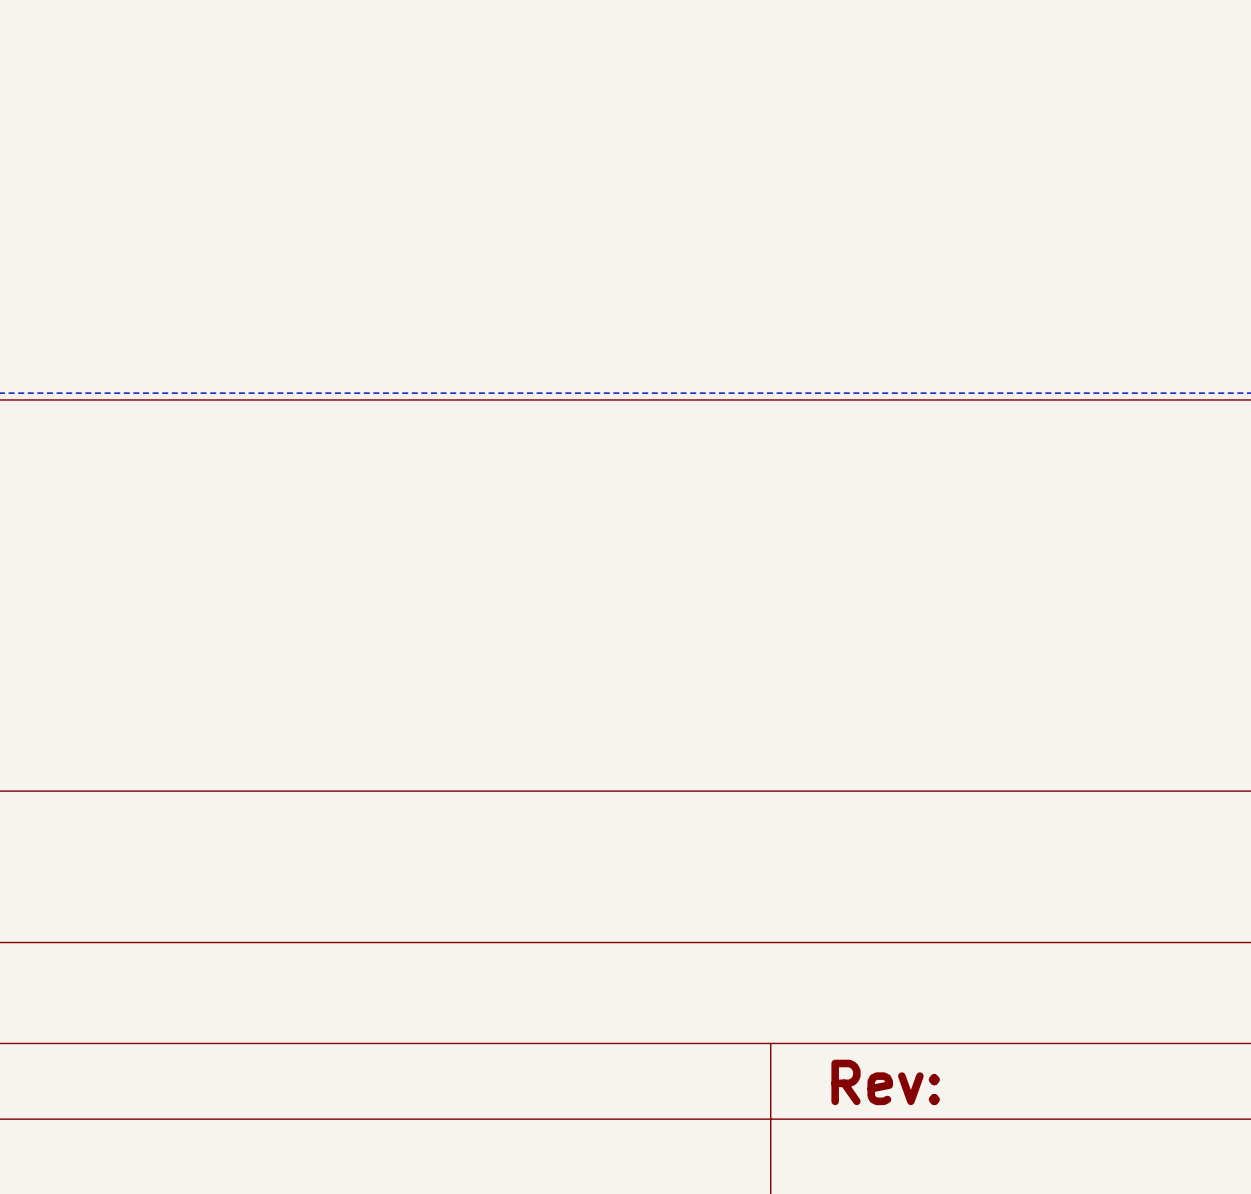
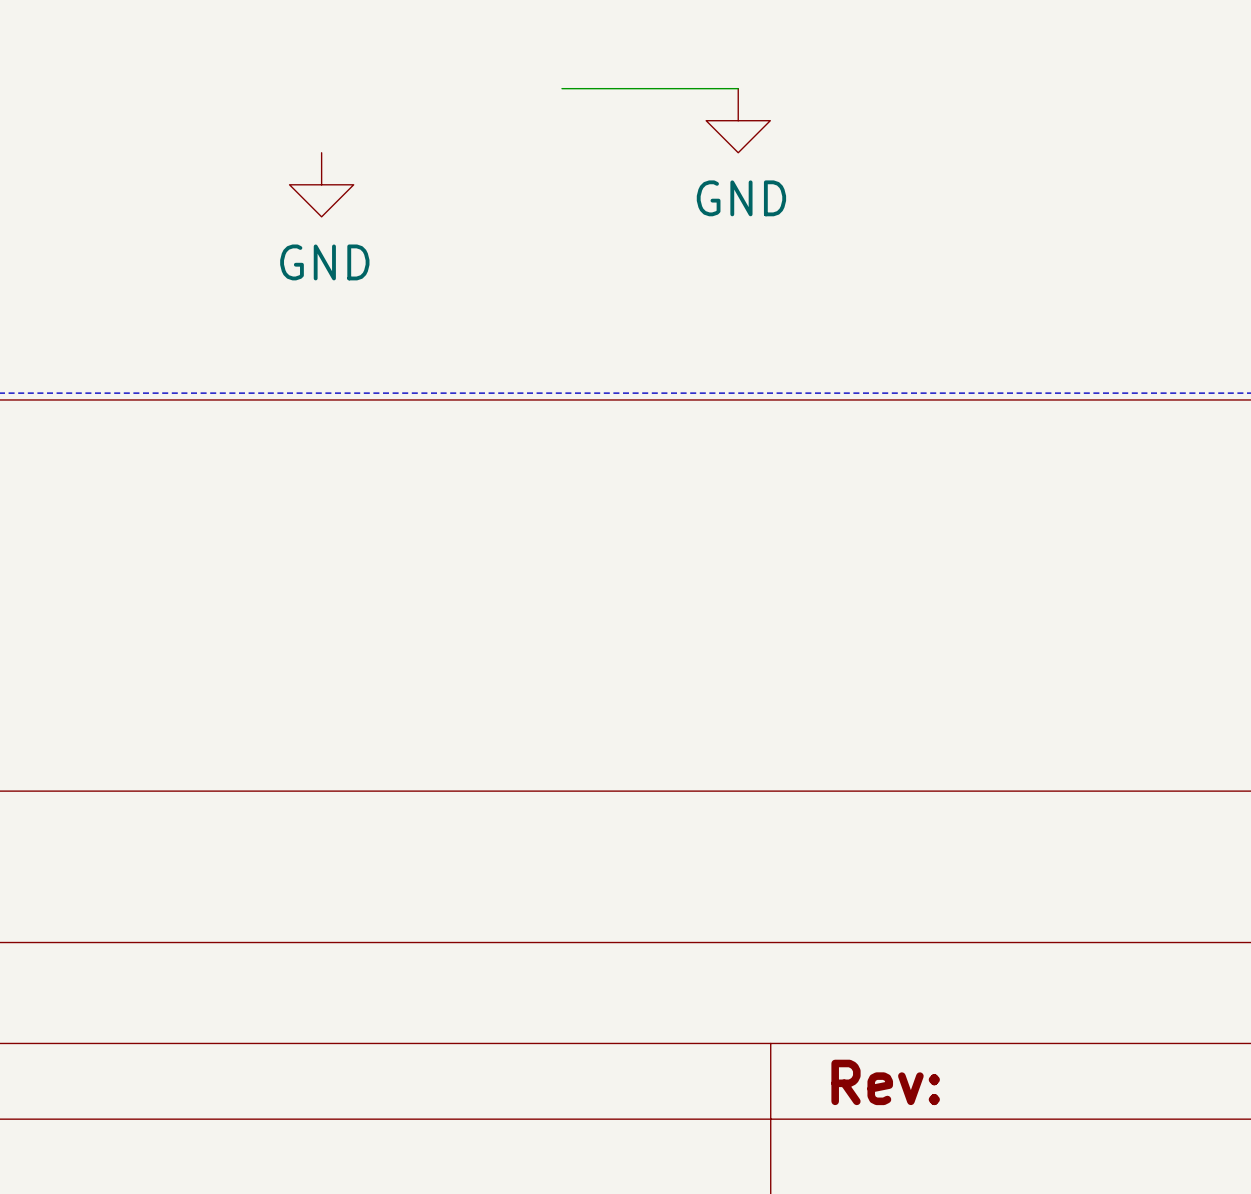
wire: none -> (561, 88) (738, 88)
power symbol: none -> GND (738, 120)
power symbol: none -> GND (321, 184)

